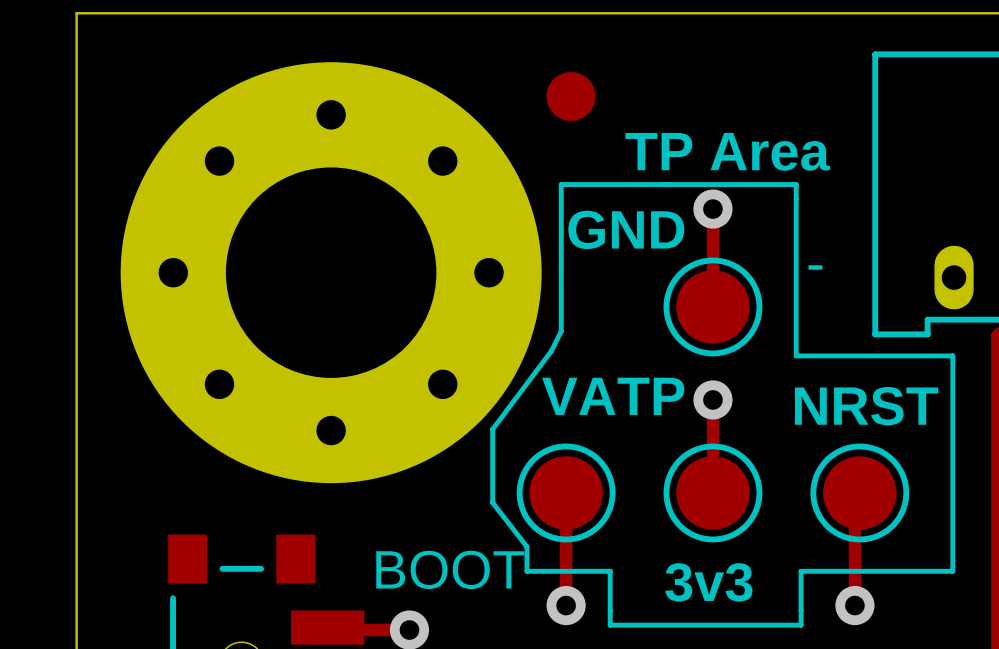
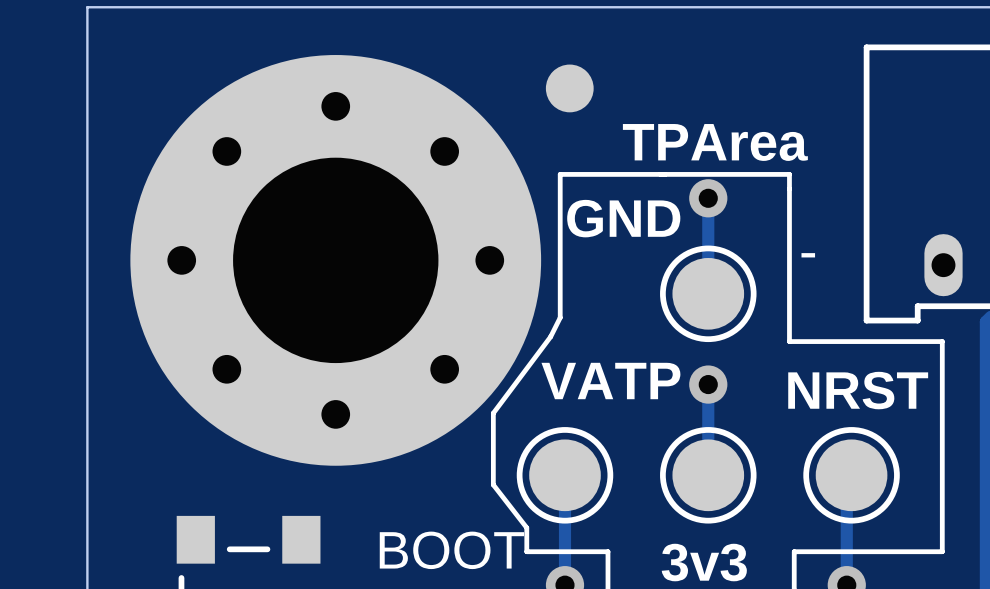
text: TP Area (727, 151) -> TPArea (715, 142)

